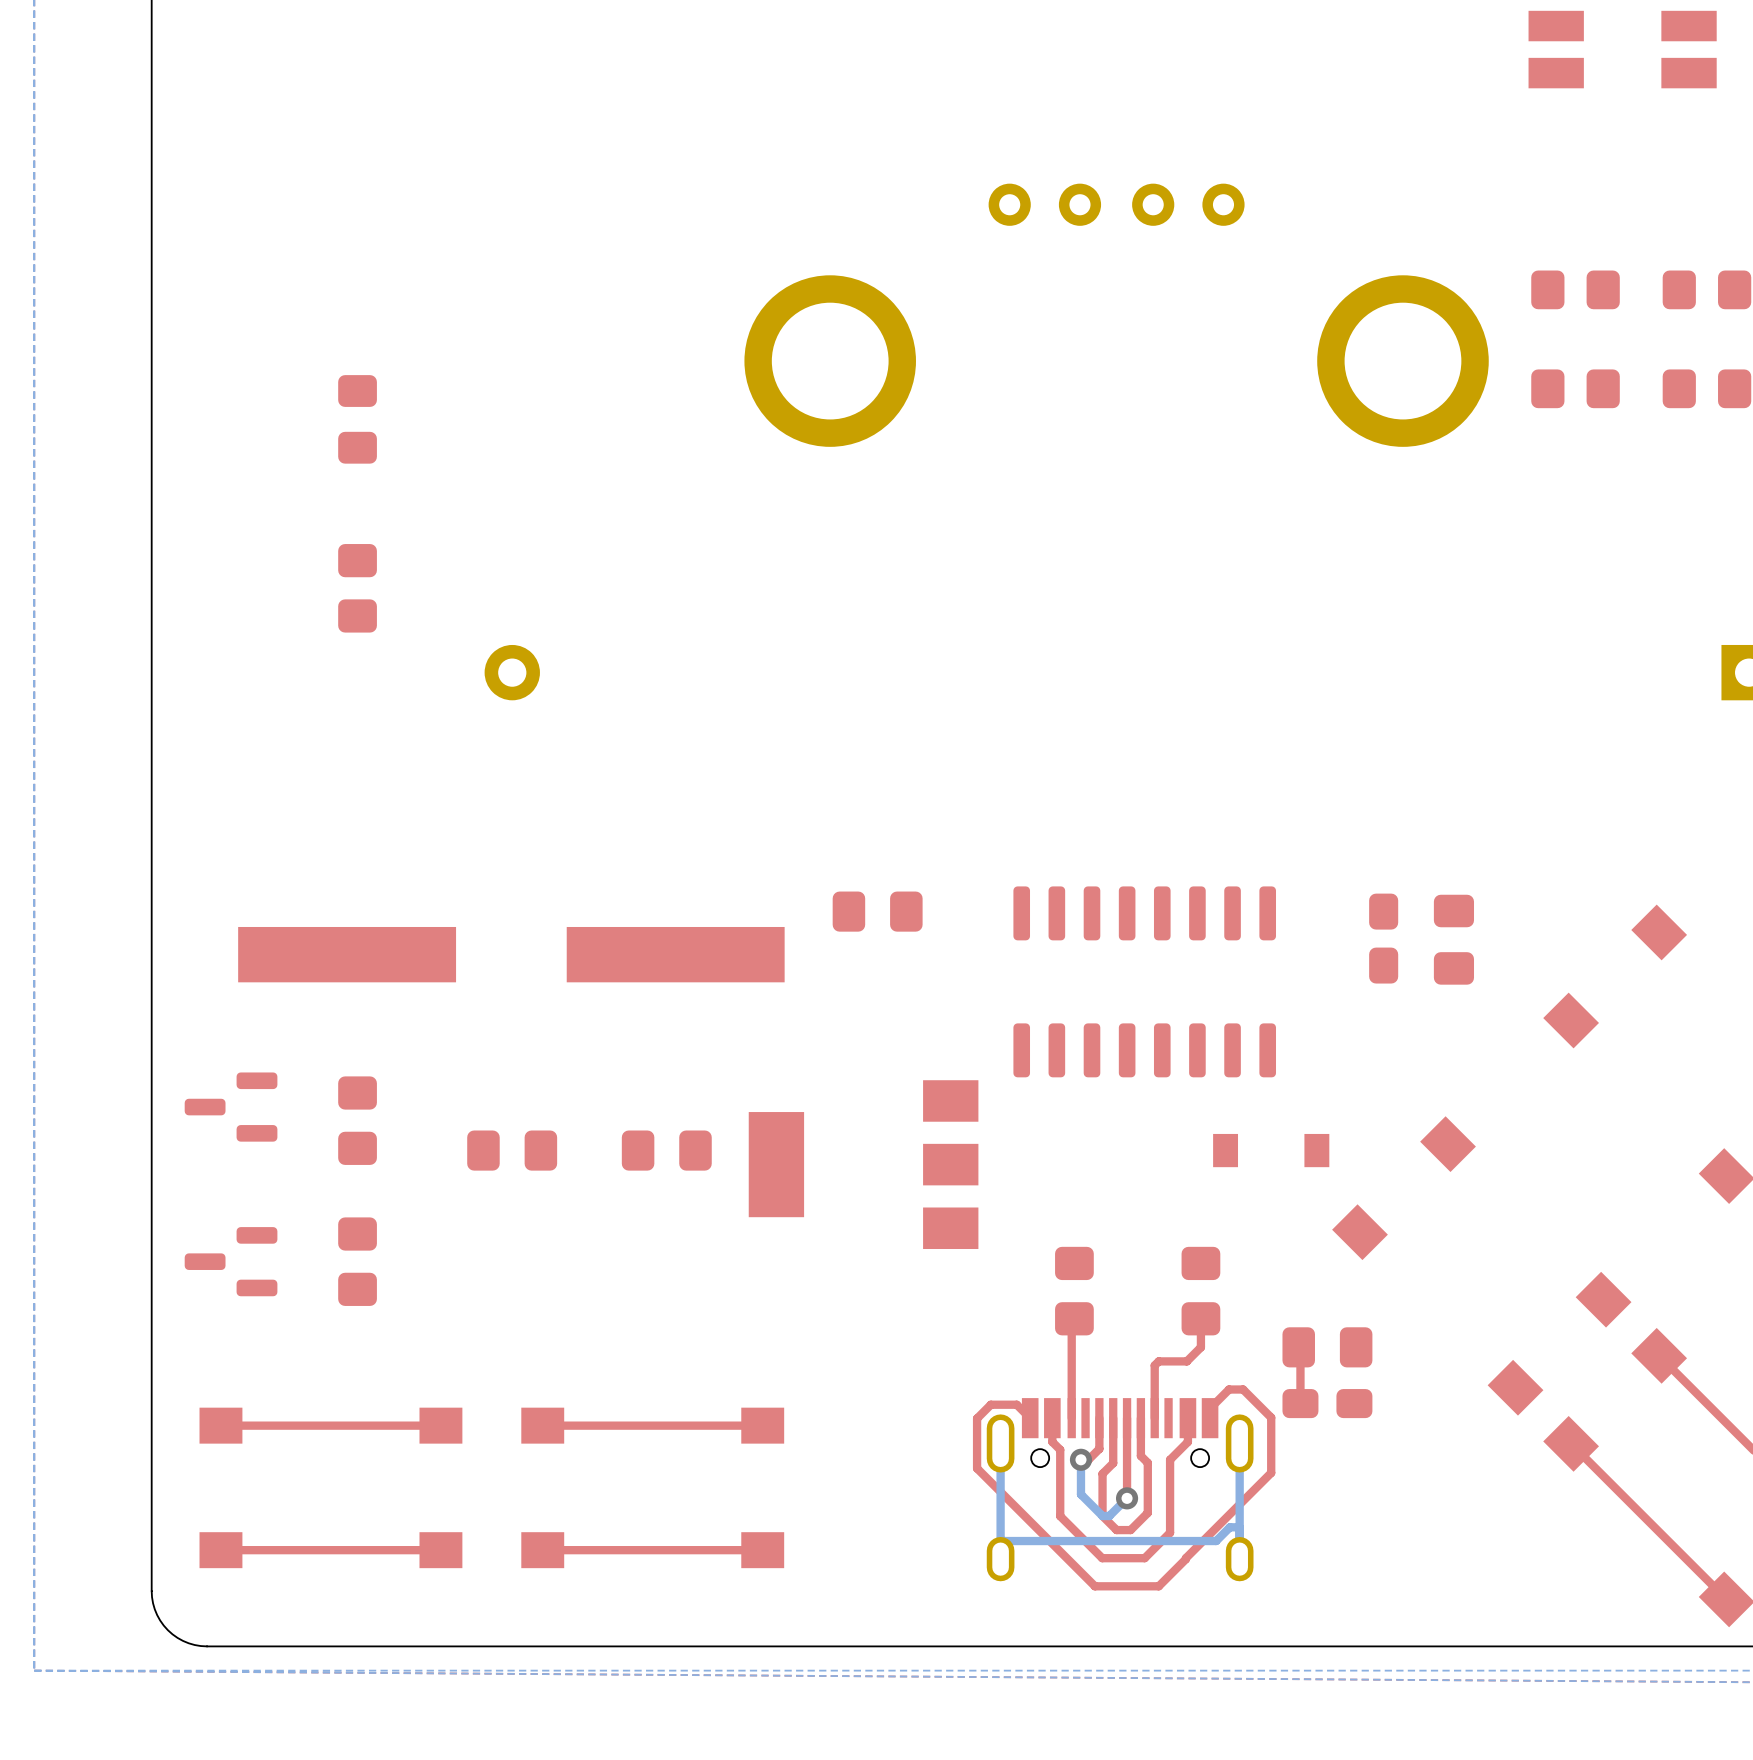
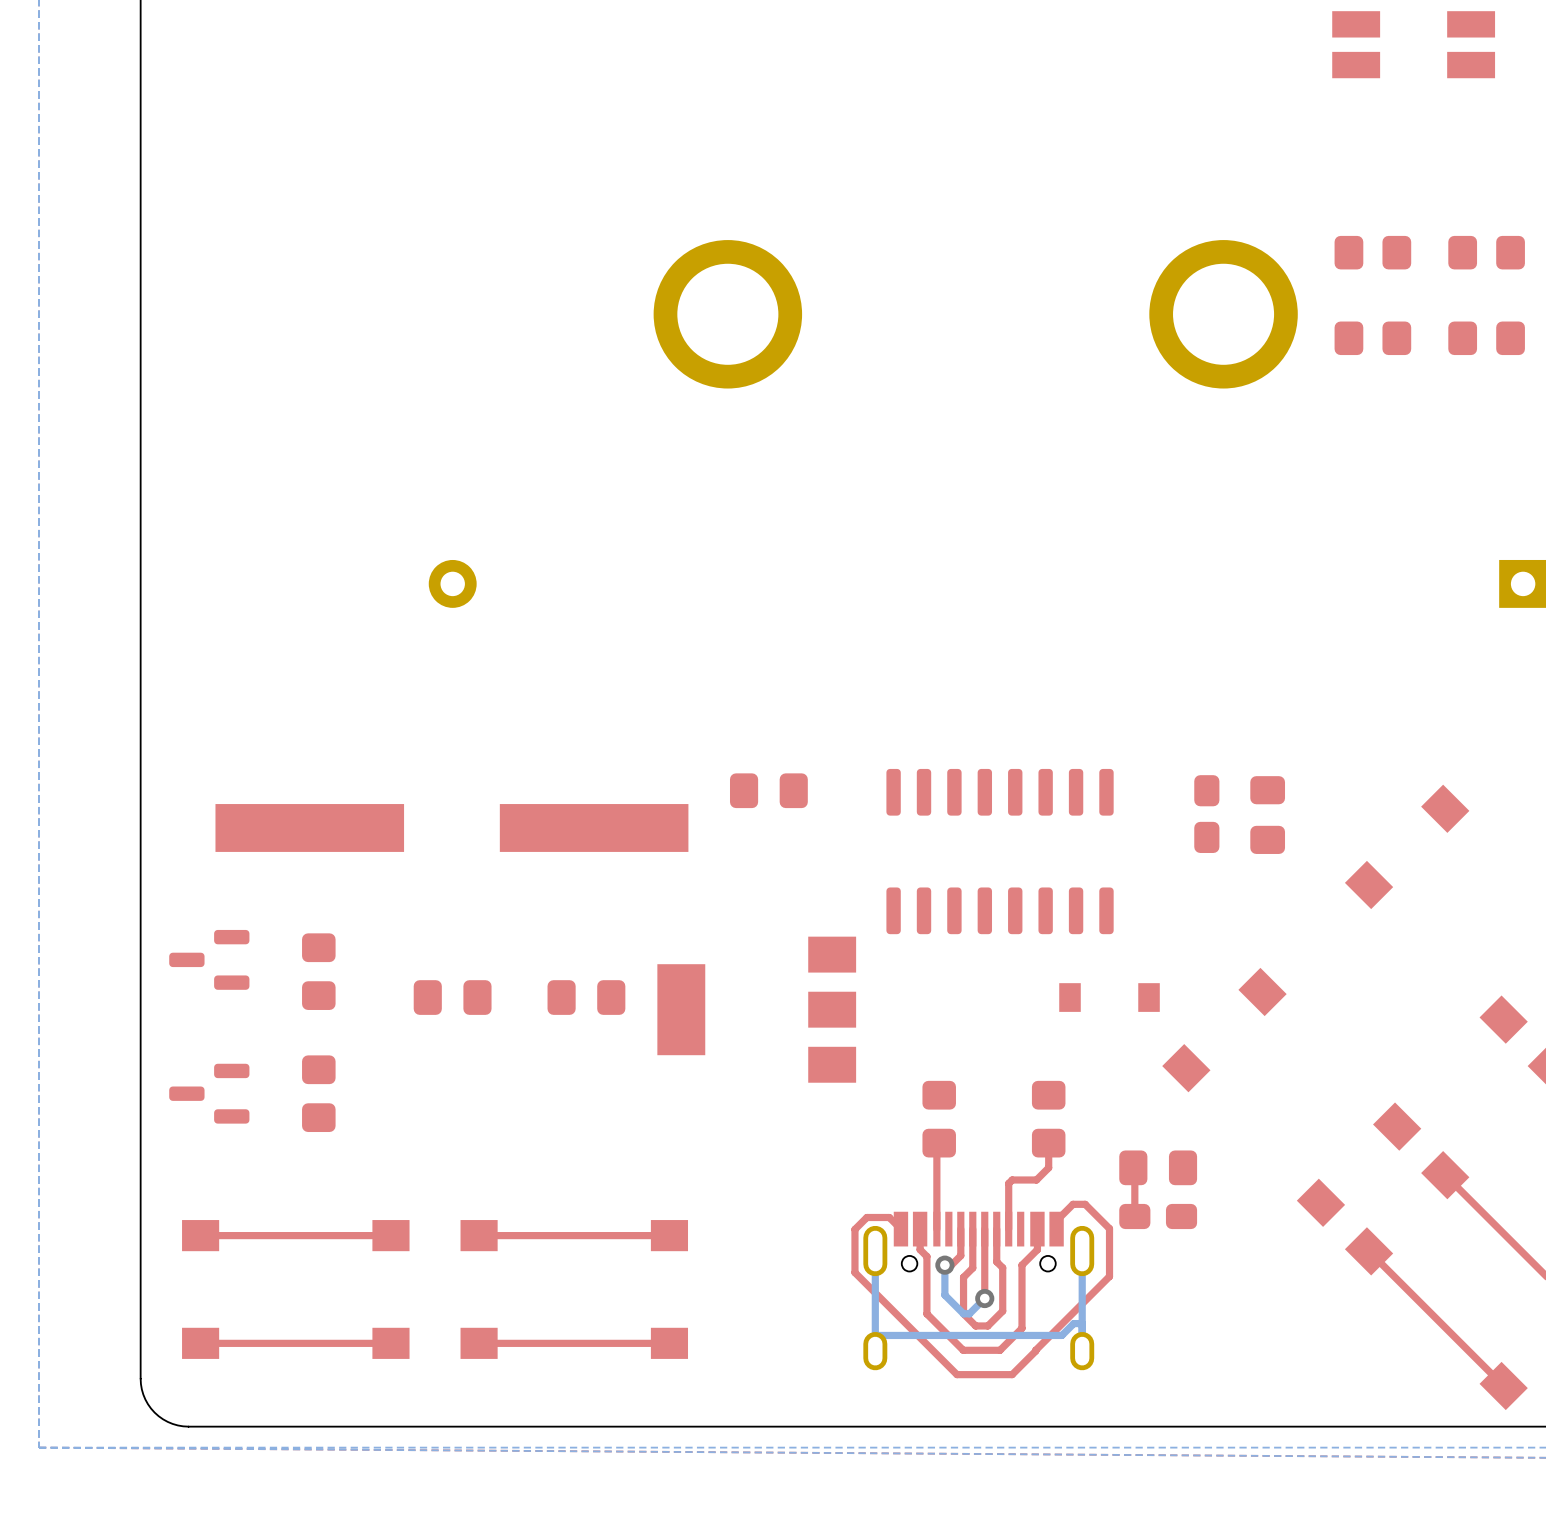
part: (1116, 204) -> none
part: (357, 419) -> none
part: (357, 588) -> none

